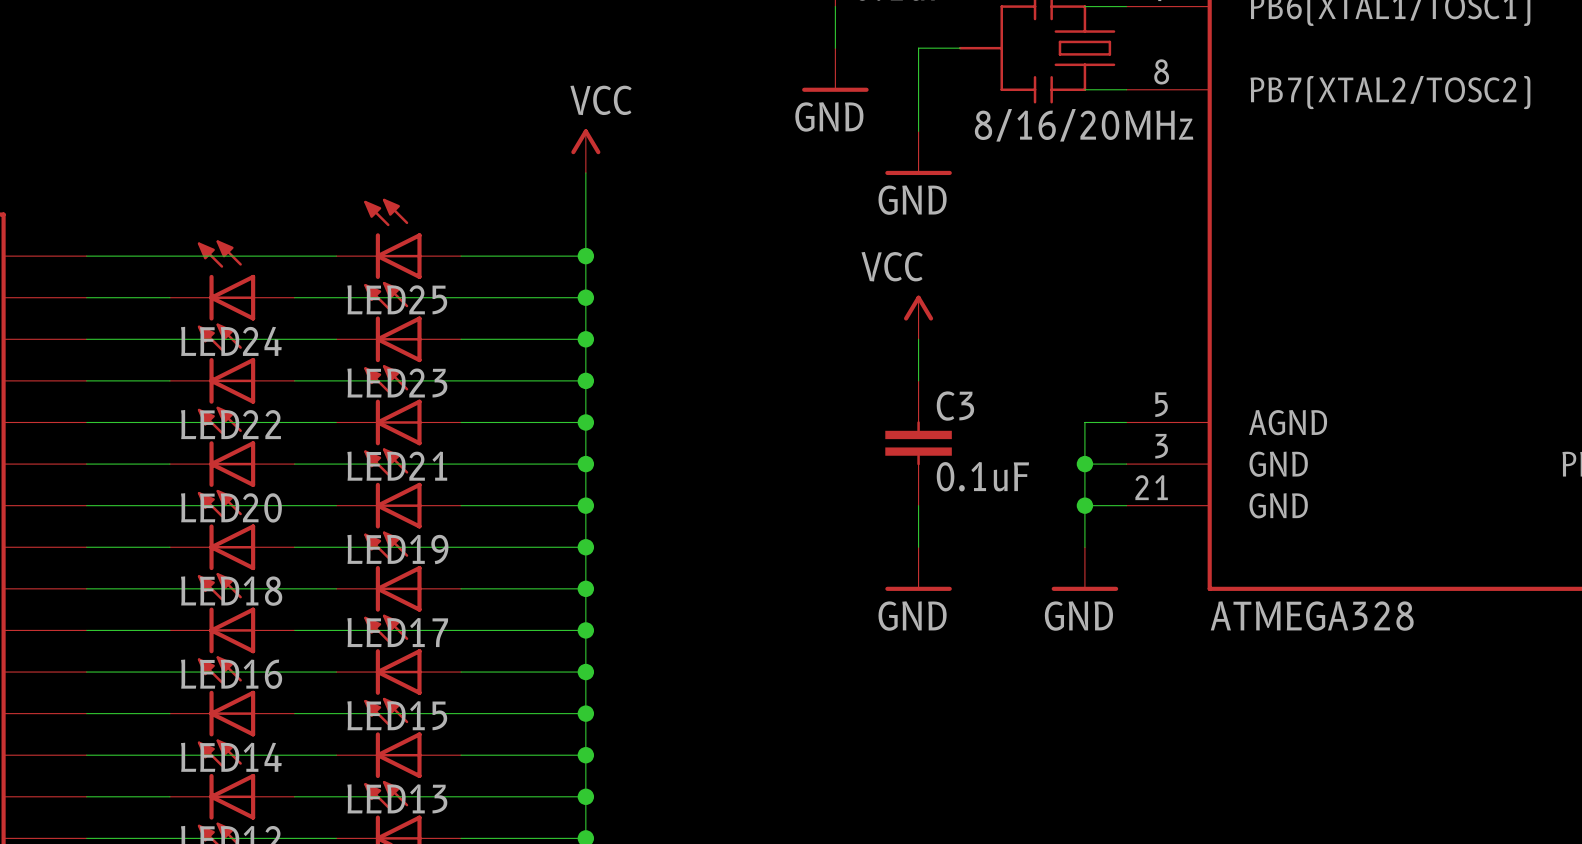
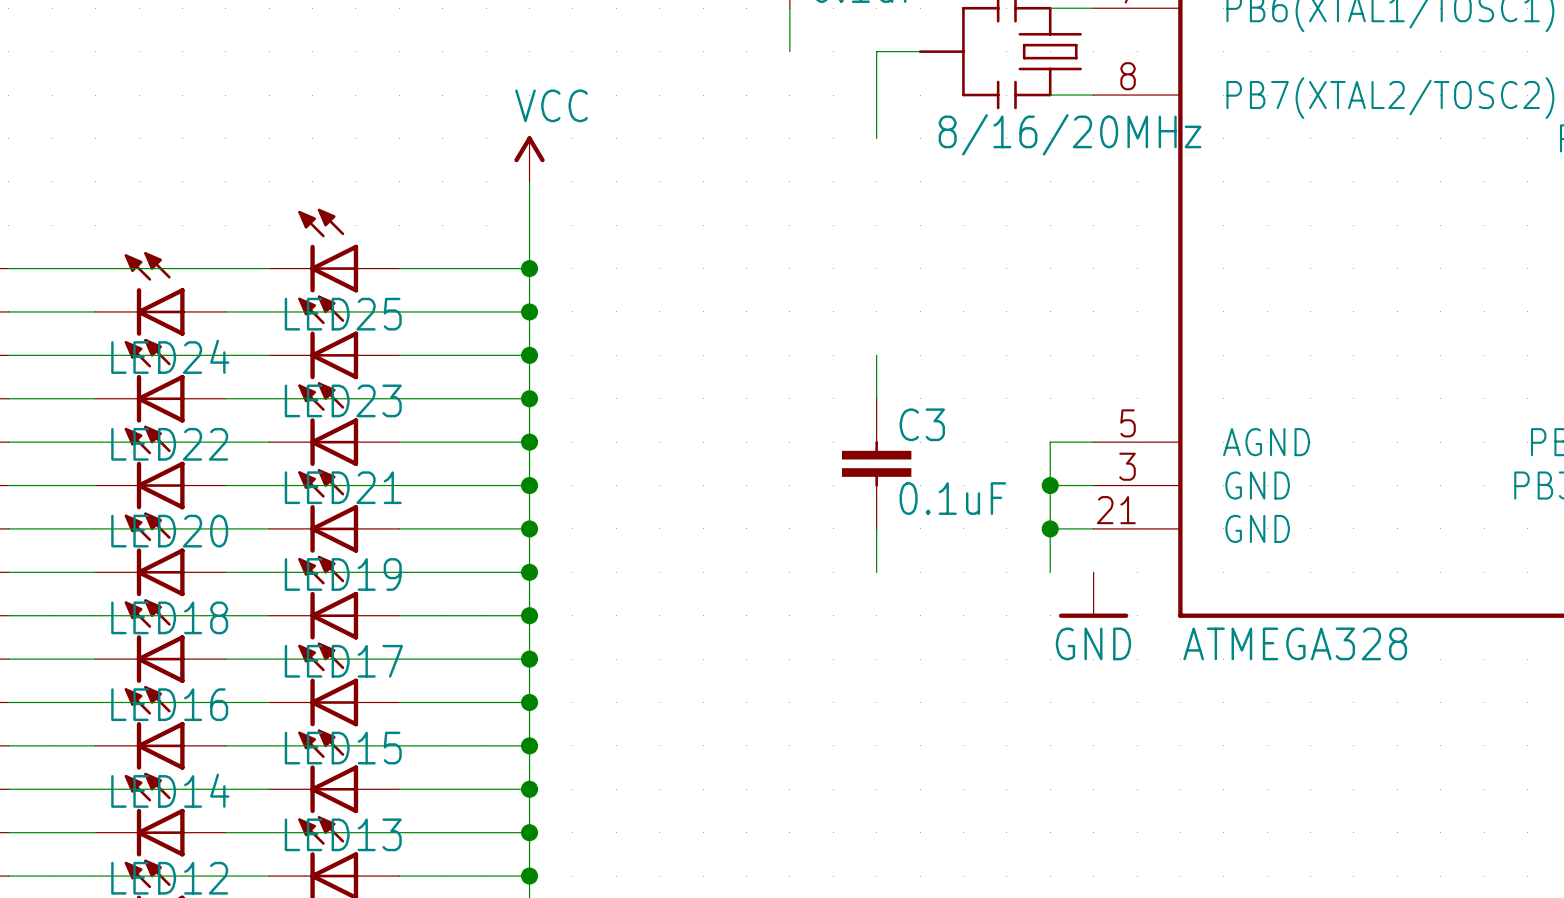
power symbol: GND (835, 70) -> none
power symbol: GND (918, 153) -> none
power symbol: VCC (918, 317) -> none
power symbol: GND (918, 569) -> none
power symbol position: GND (1084, 569) -> GND (1093, 595)

